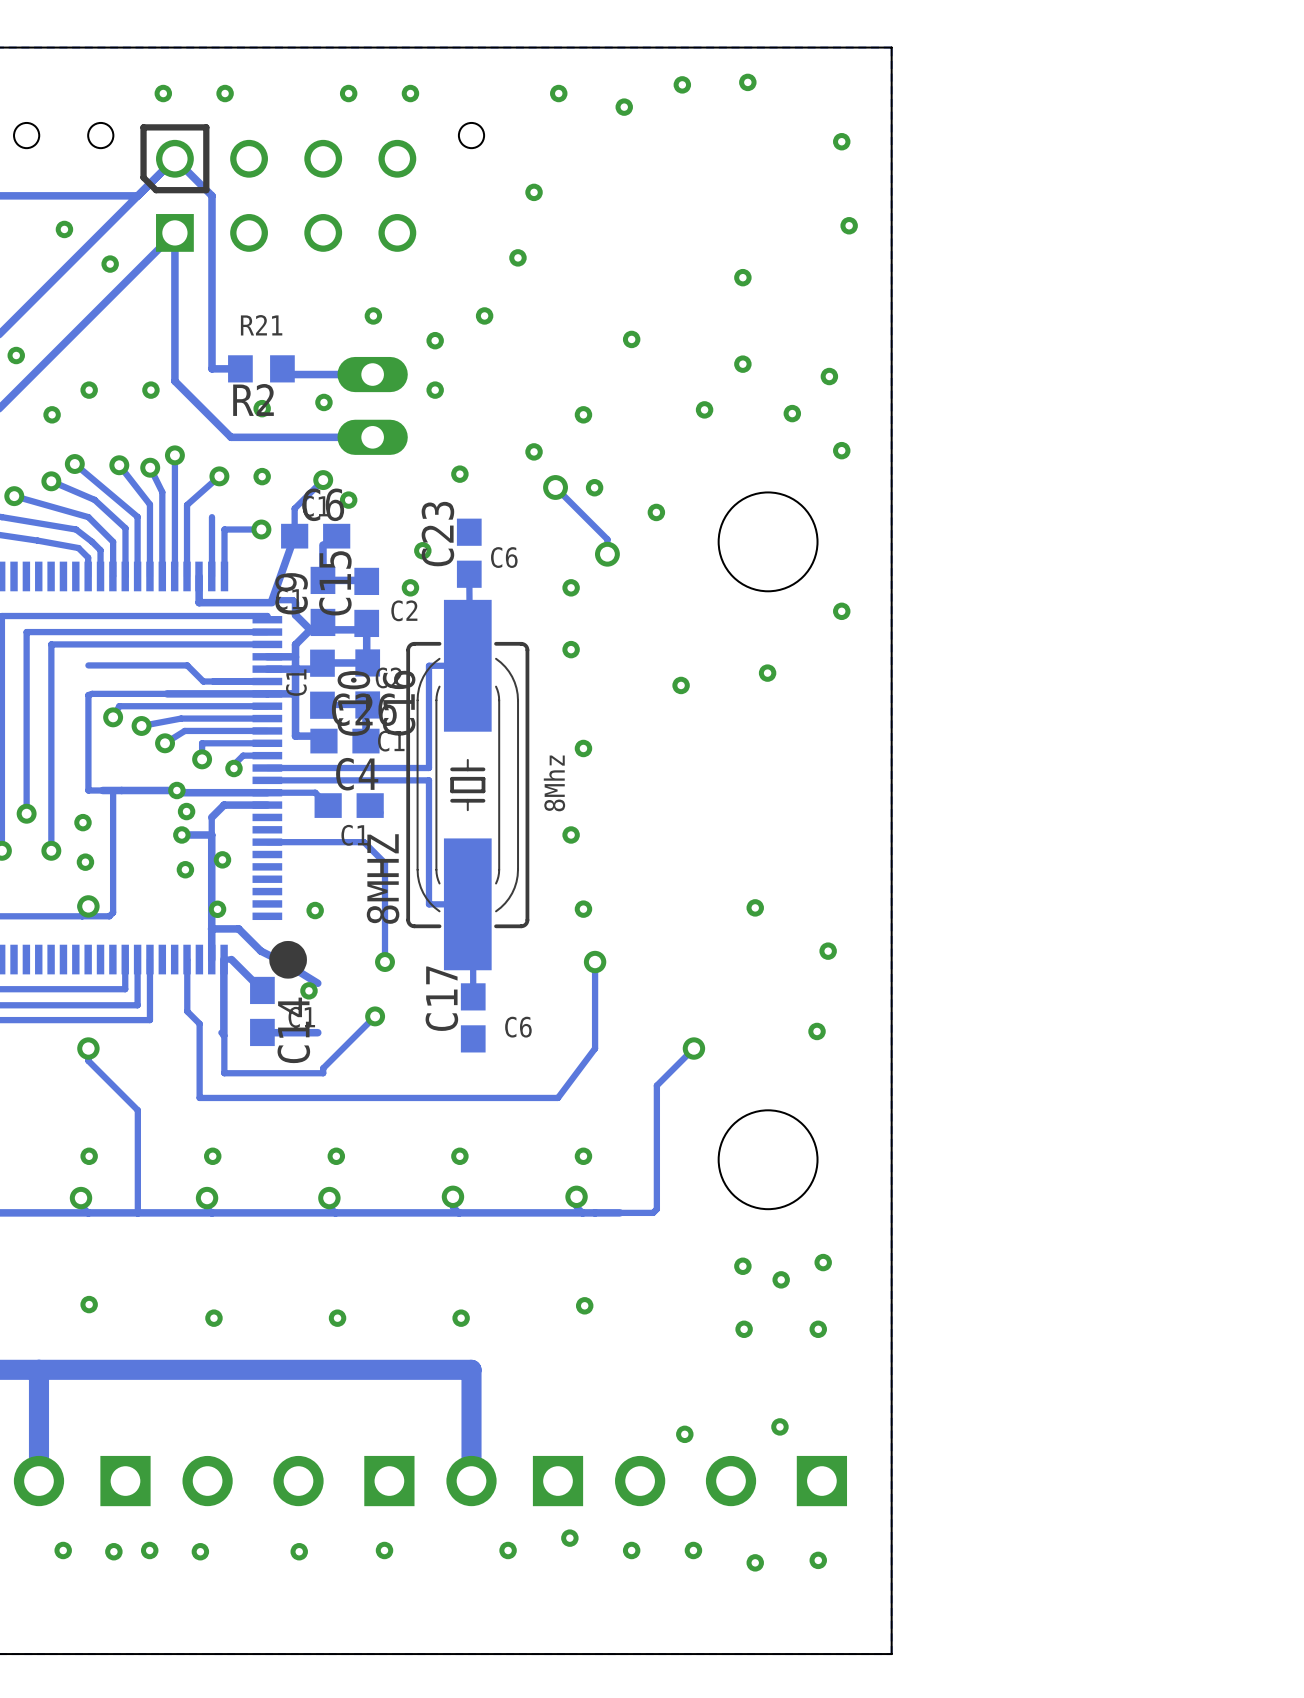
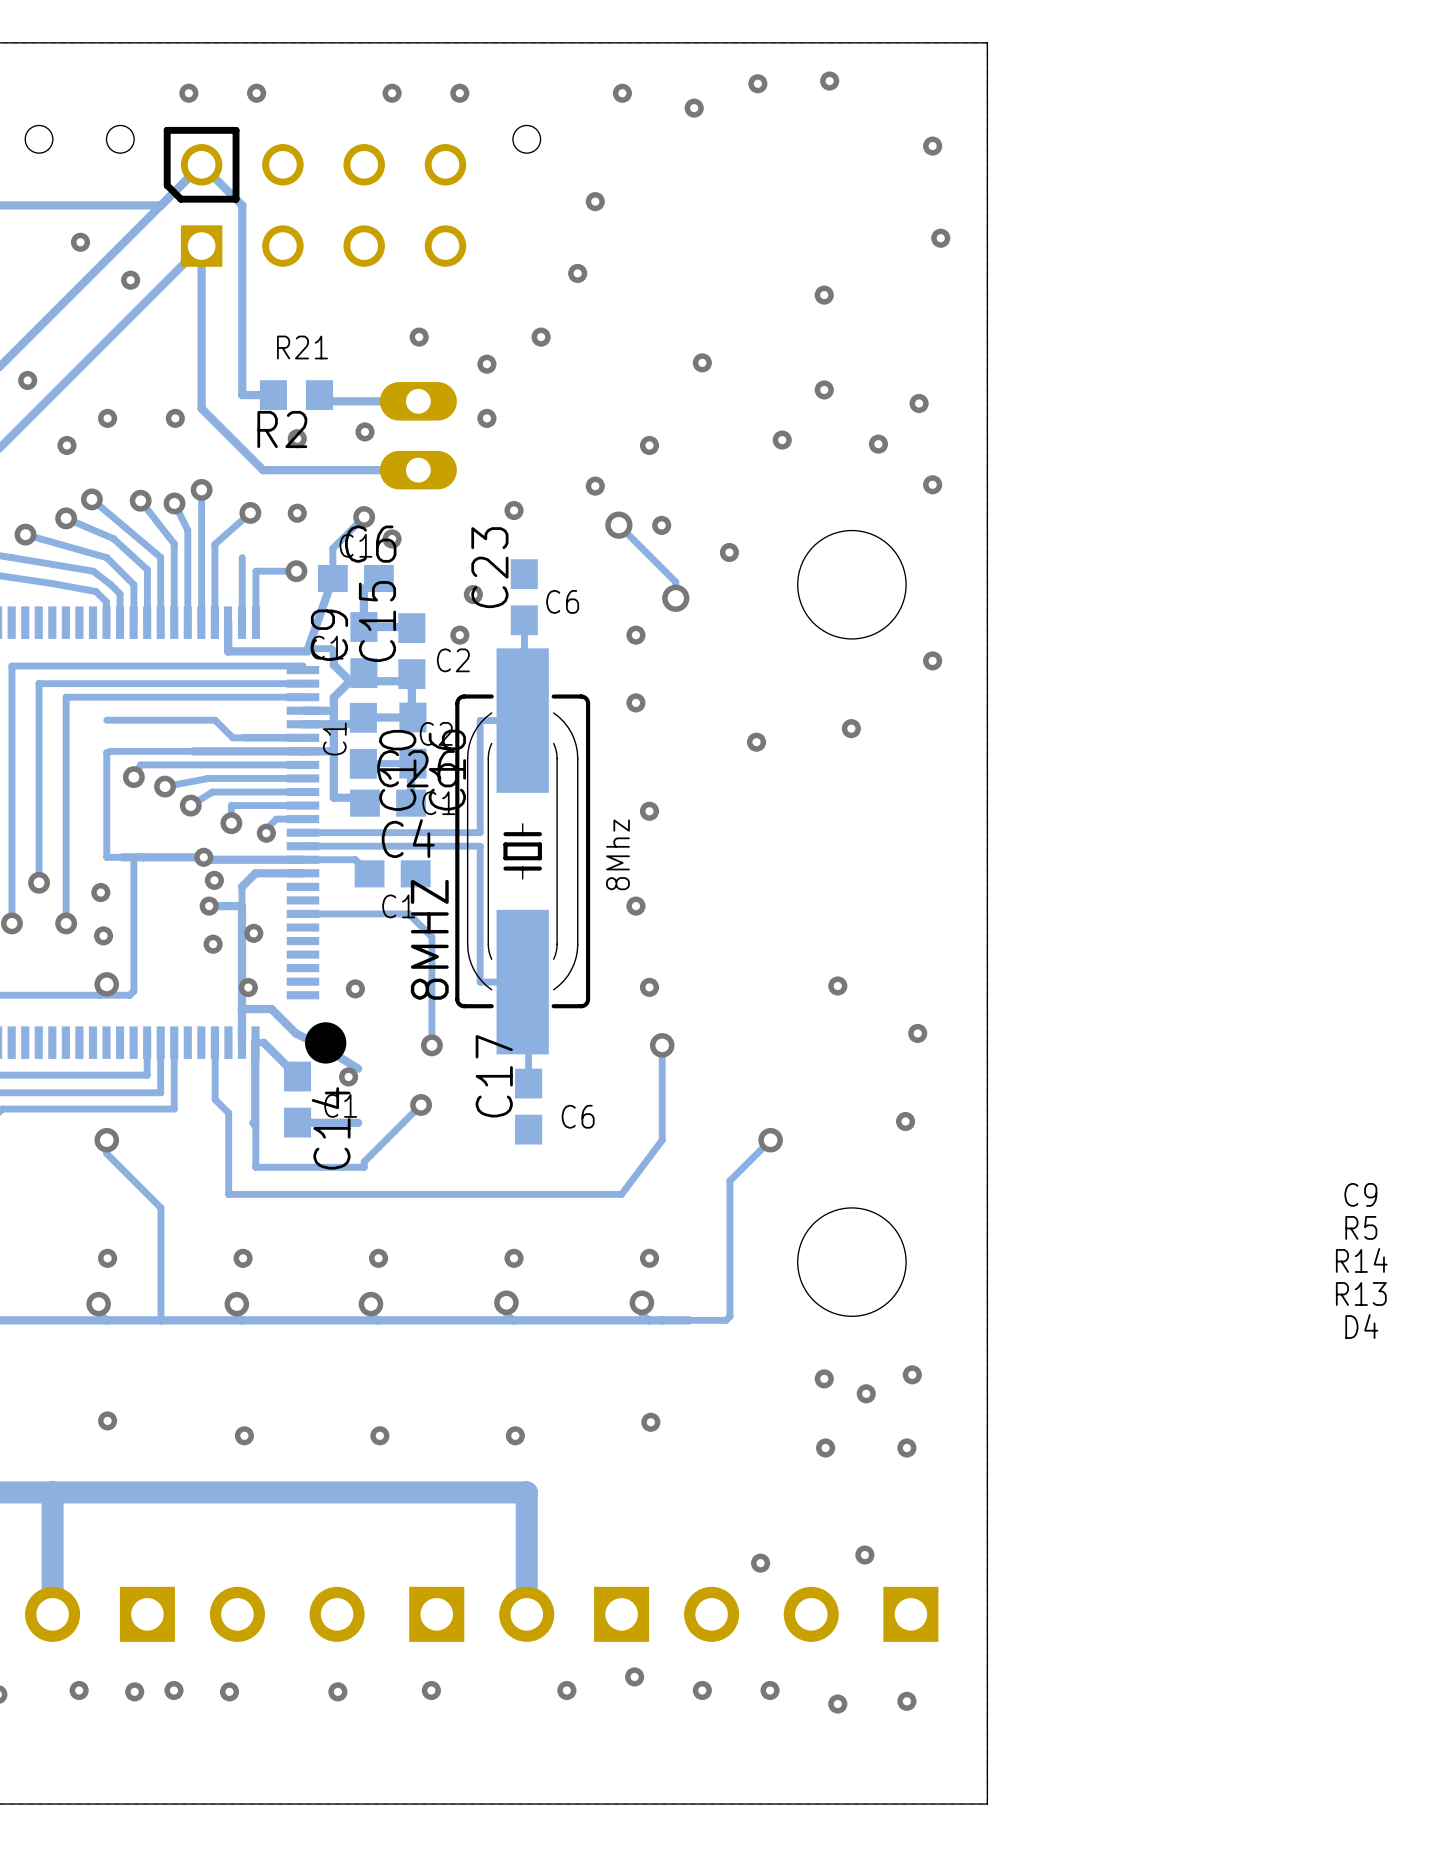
text: none -> C9 (1360, 1194)
text: none -> R5 (1361, 1227)
text: none -> R14 (1361, 1260)
text: none -> R13 (1361, 1294)
text: none -> D4 (1361, 1326)

